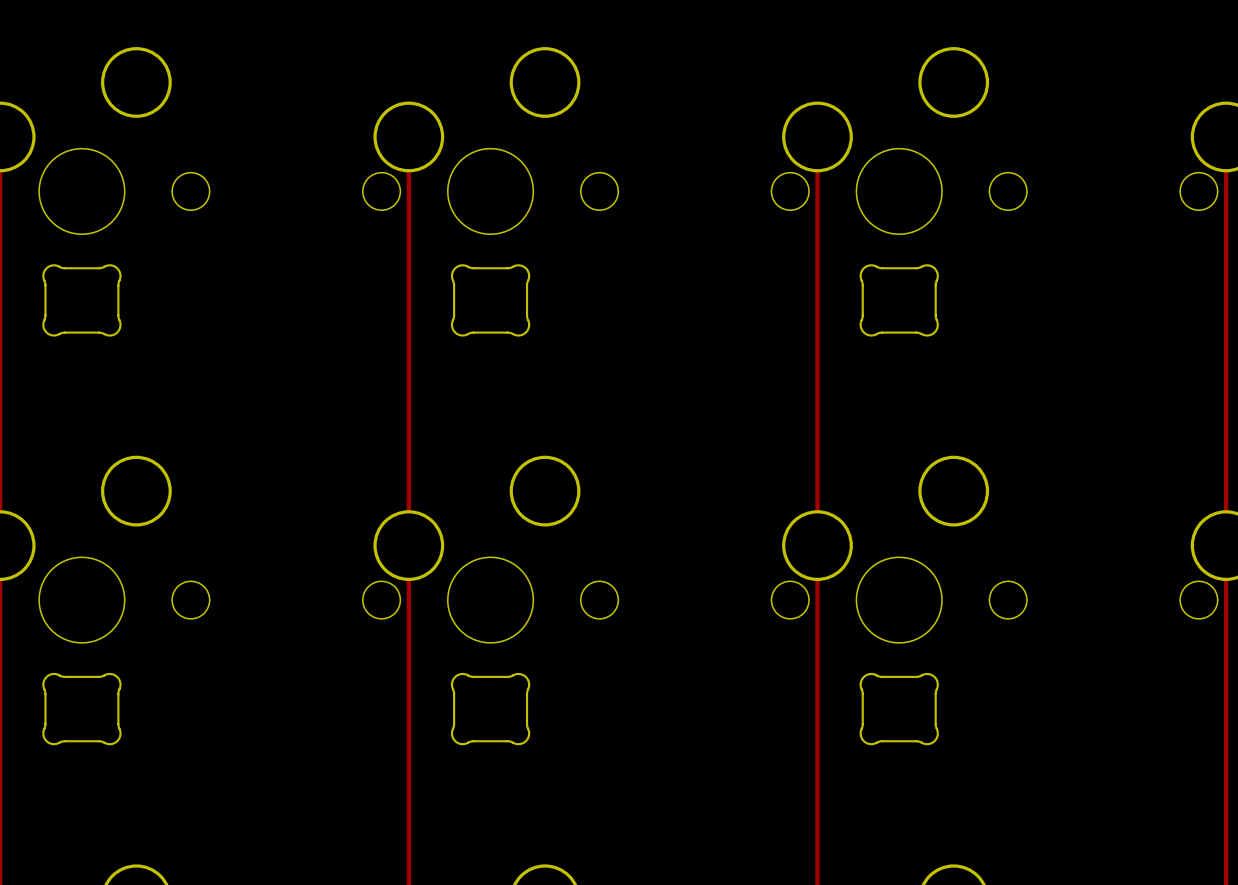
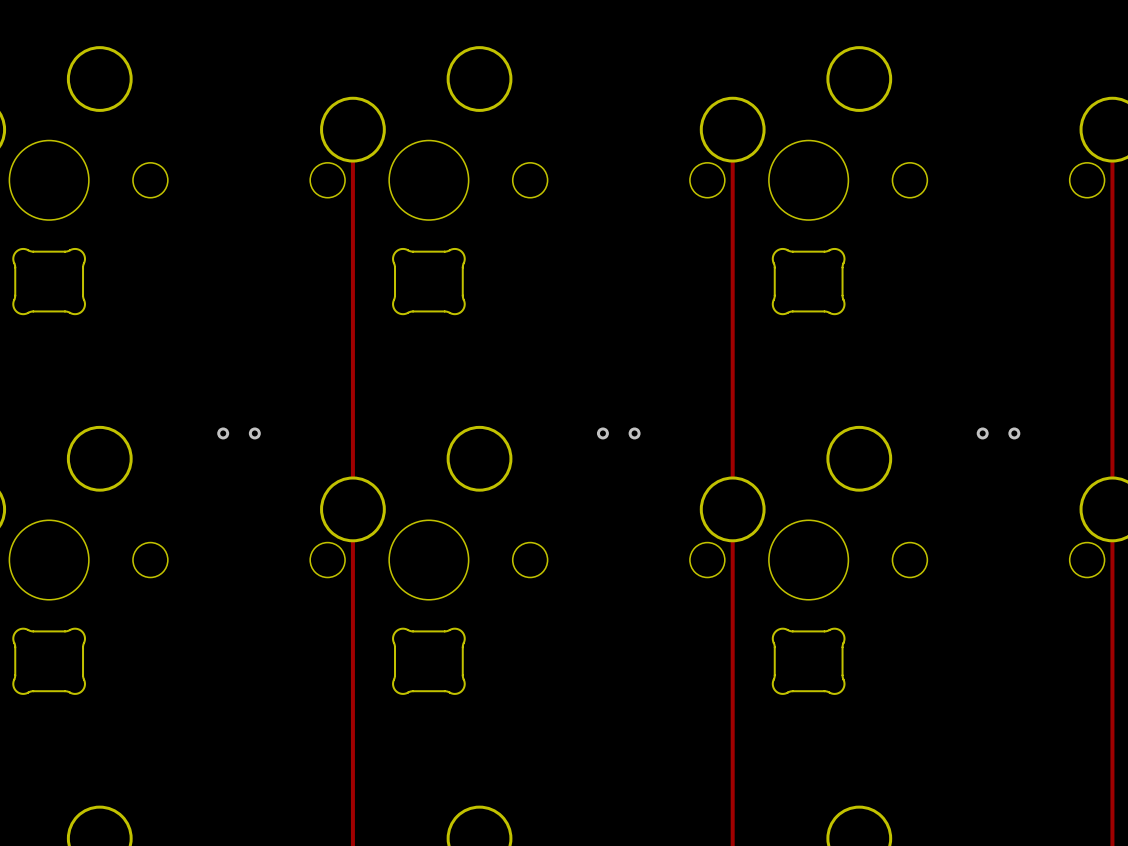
via: none -> (223, 433)
via: none -> (254, 433)
via: none -> (602, 433)
via: none -> (634, 433)
via: none -> (982, 433)
via: none -> (1014, 433)

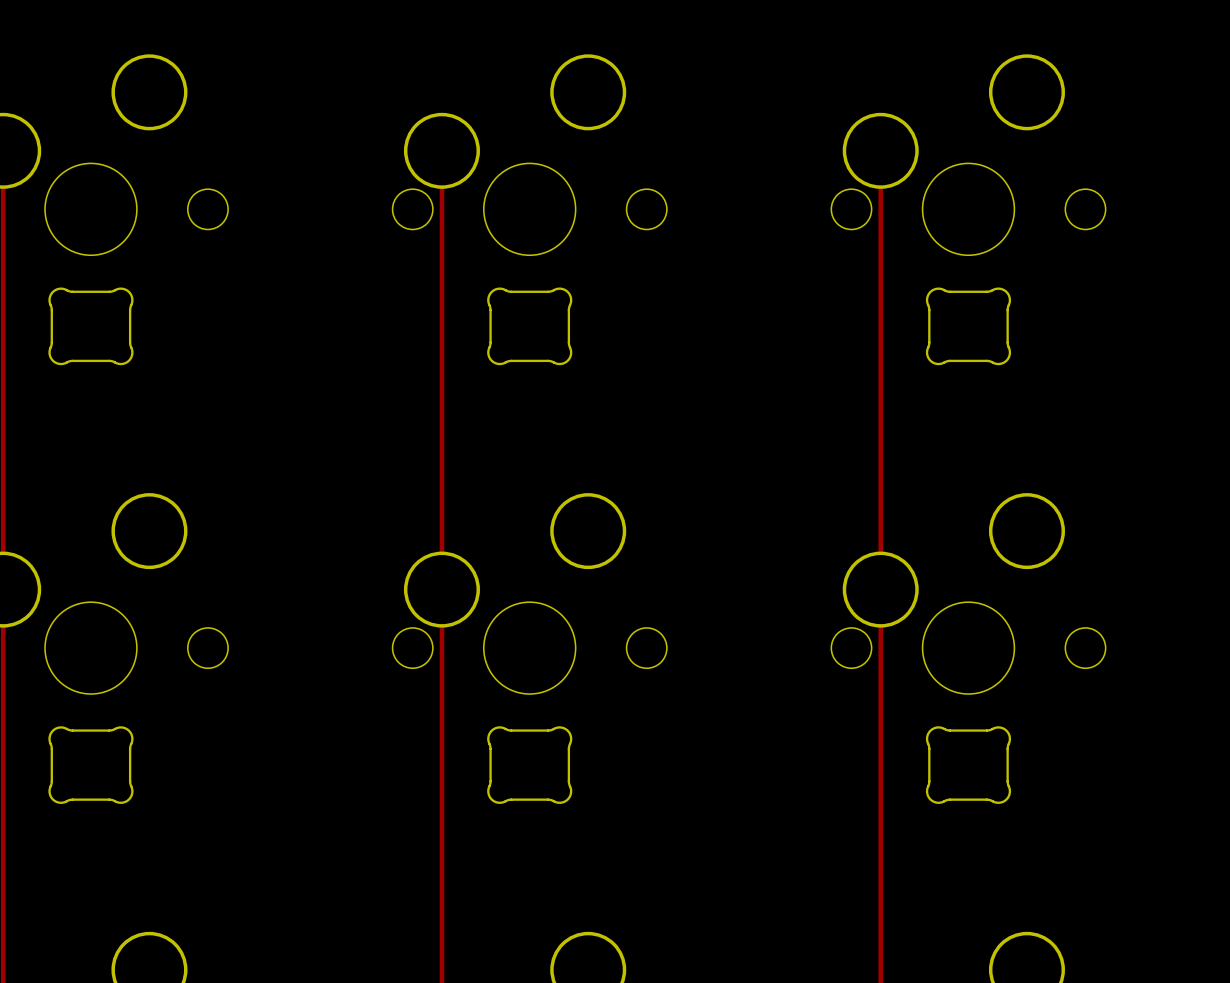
via: (223, 433) -> none
via: (254, 433) -> none
via: (602, 433) -> none
via: (634, 433) -> none
via: (982, 433) -> none
via: (1014, 433) -> none

